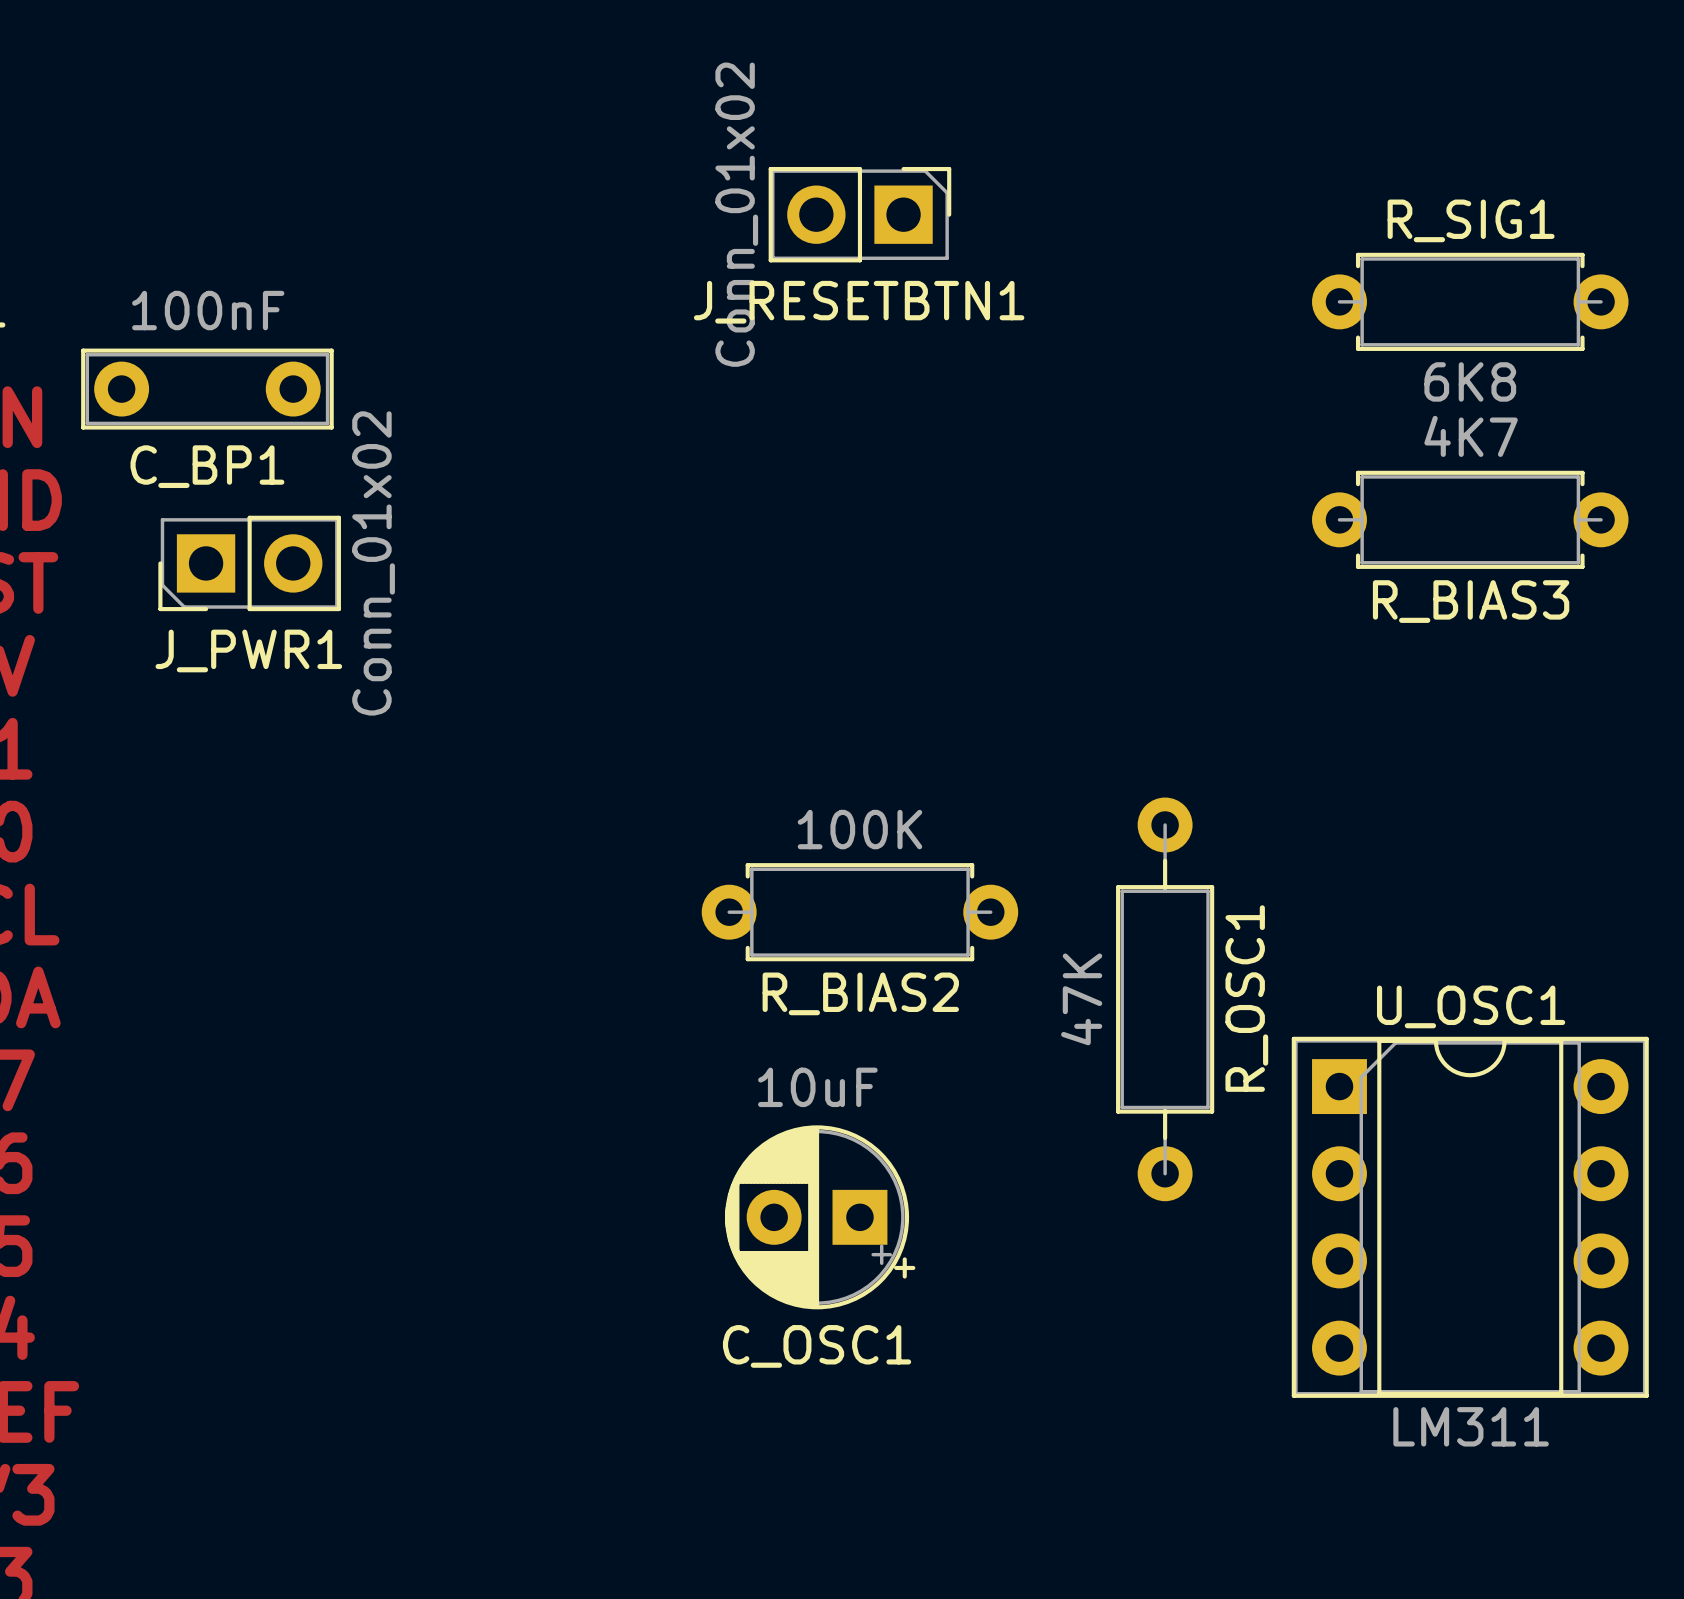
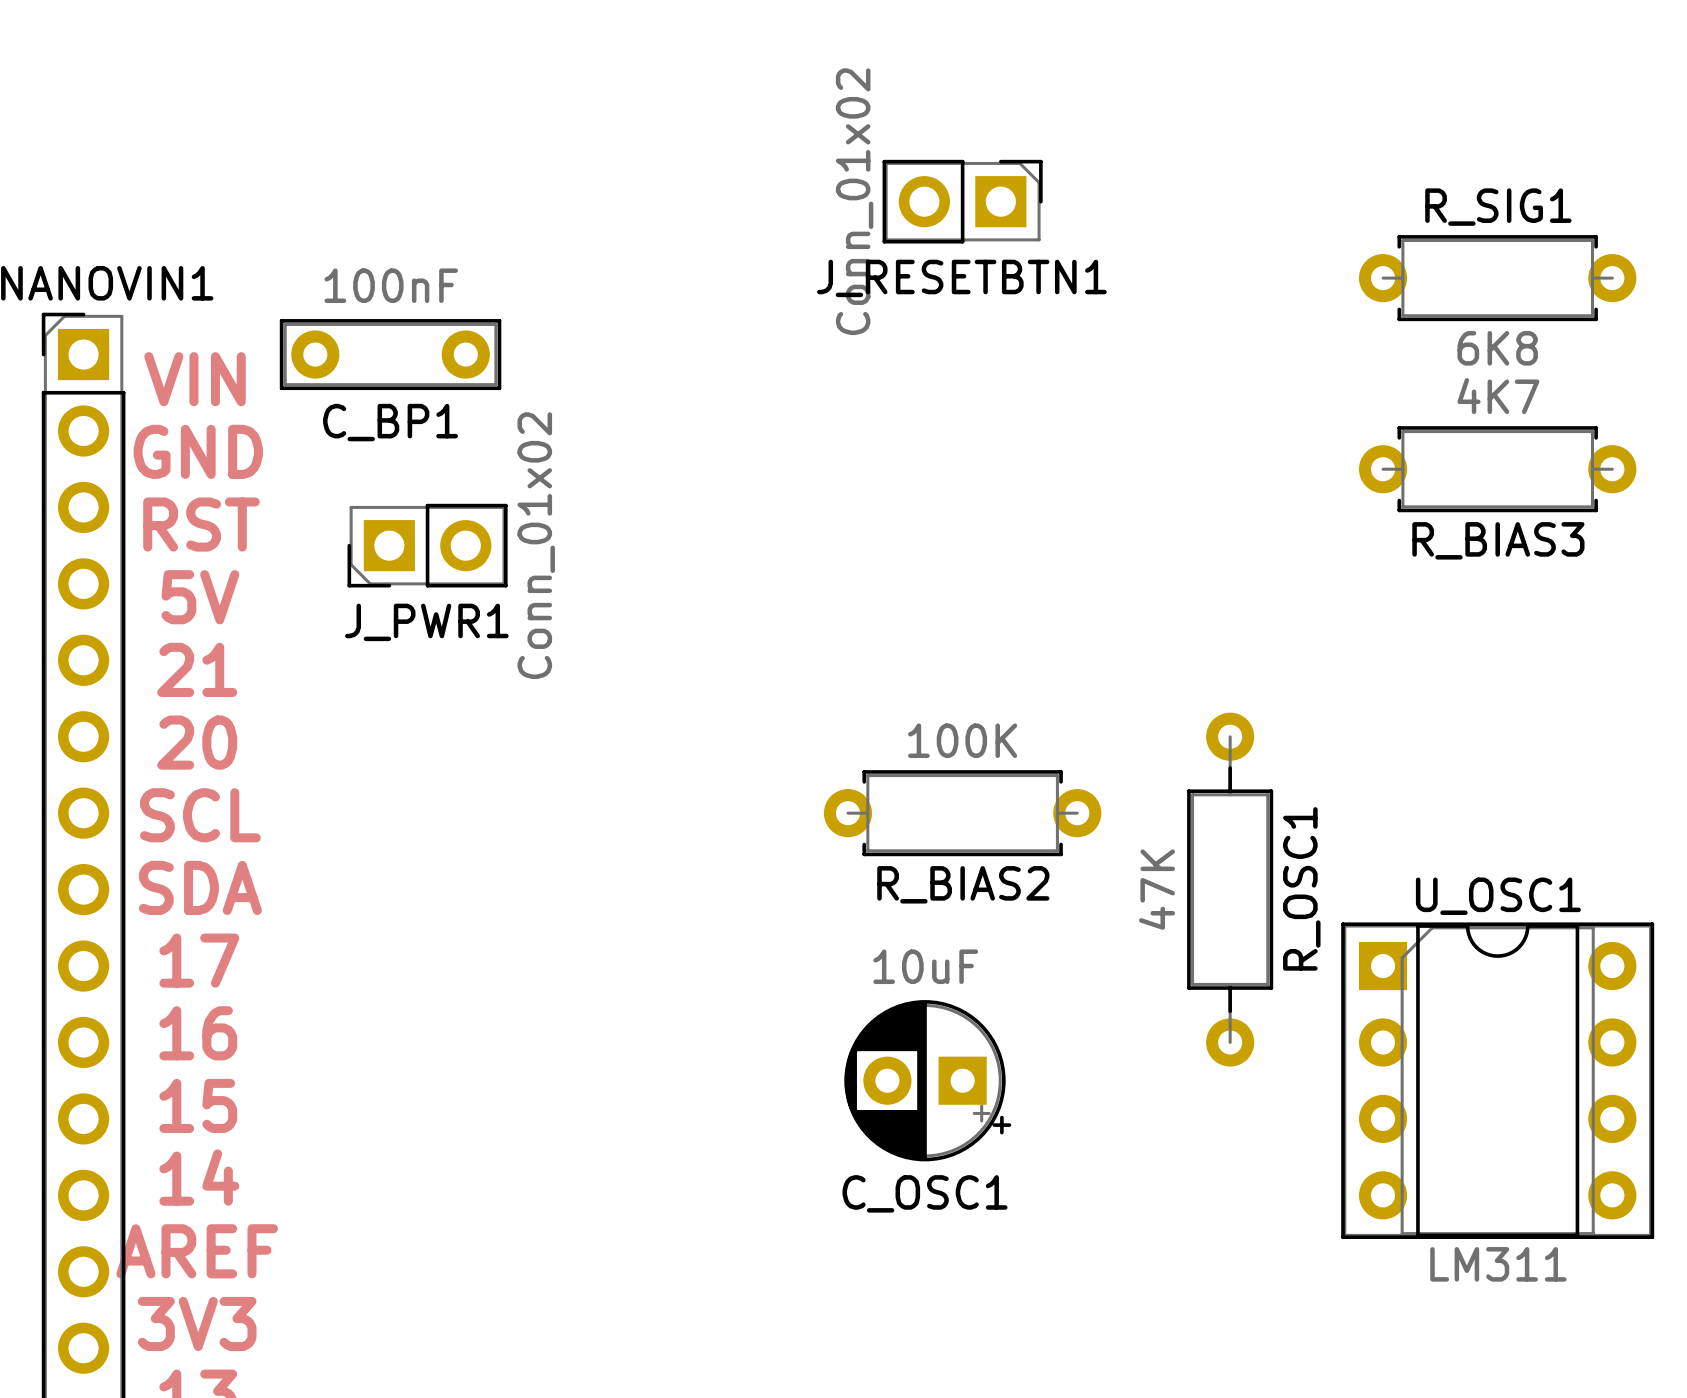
J_PWR1 position: (249, 563) -> (427, 545)

